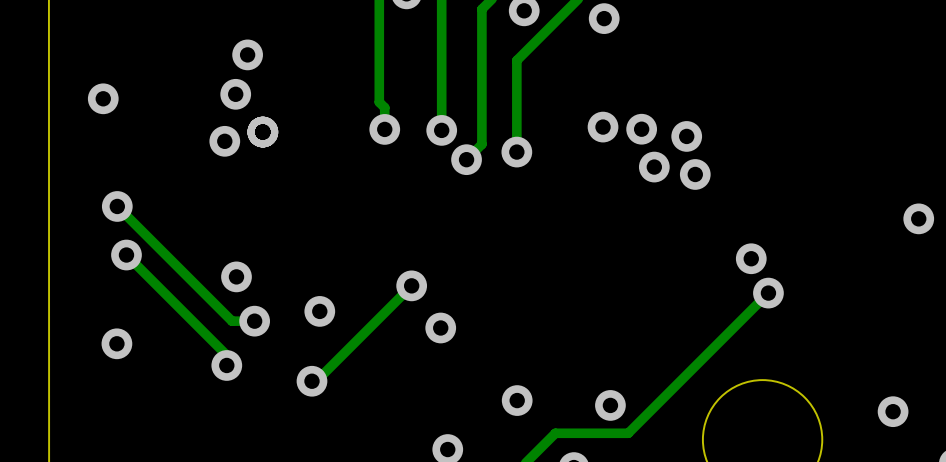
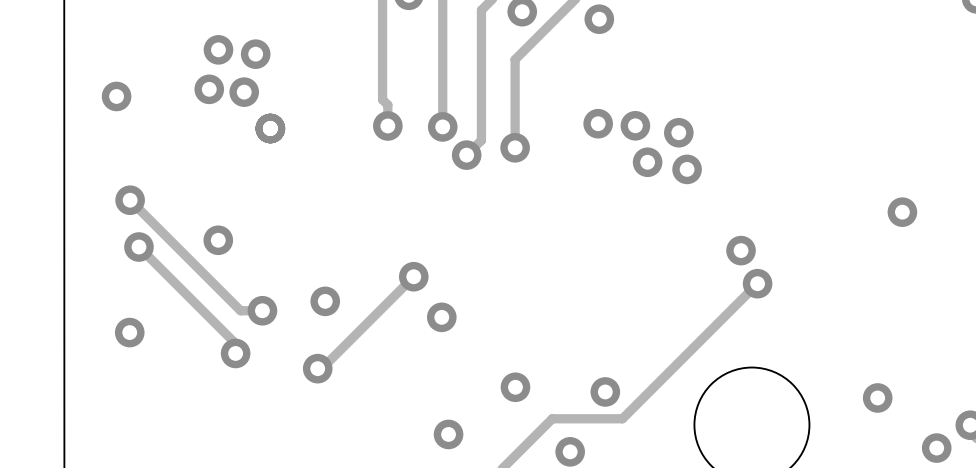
via: none -> (218, 49)
via: none -> (209, 89)
via: (224, 141) -> none
via position: (236, 276) -> (218, 240)

